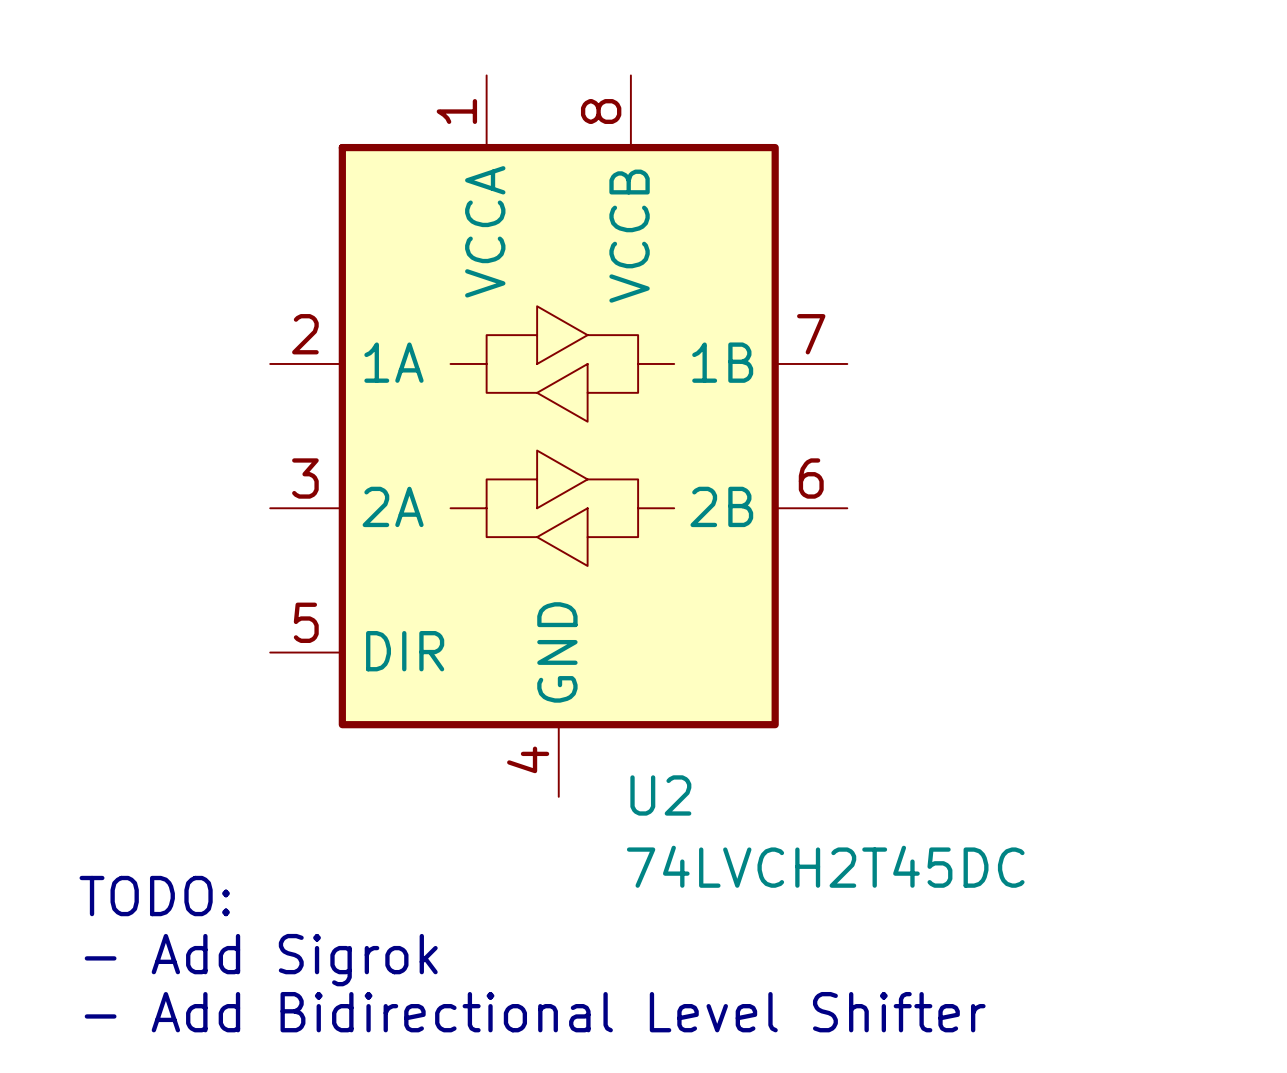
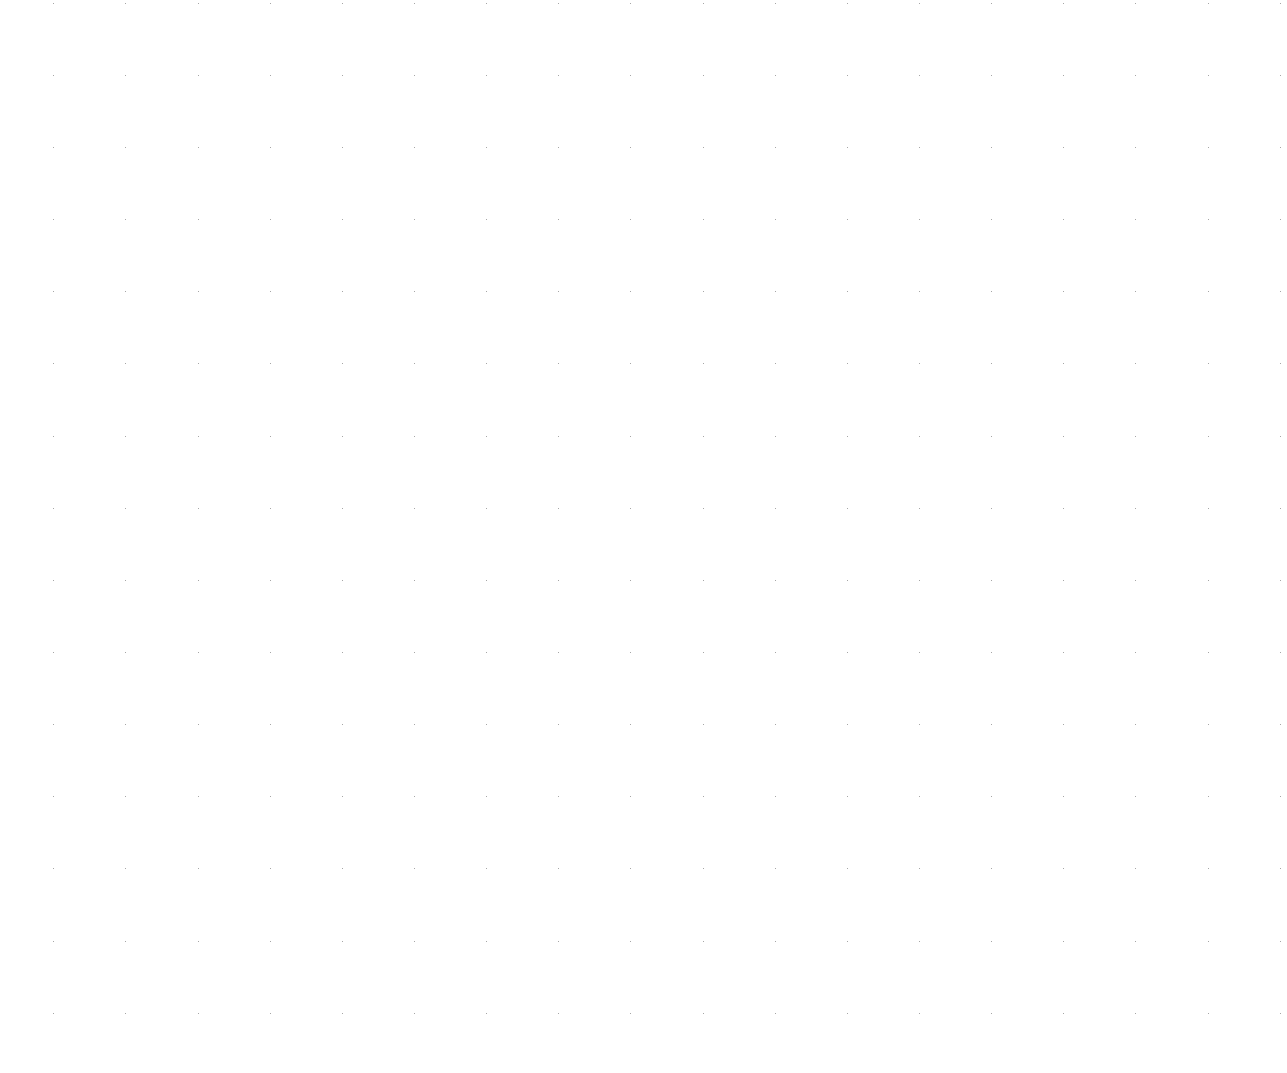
U2: 74LVCH2T45DC (558, 436) -> none
text: TODO: (154, 896) -> none
text: - Add Sigrok (261, 960) -> none
text: - Add Bidirectional Level Shifter (535, 1012) -> none

